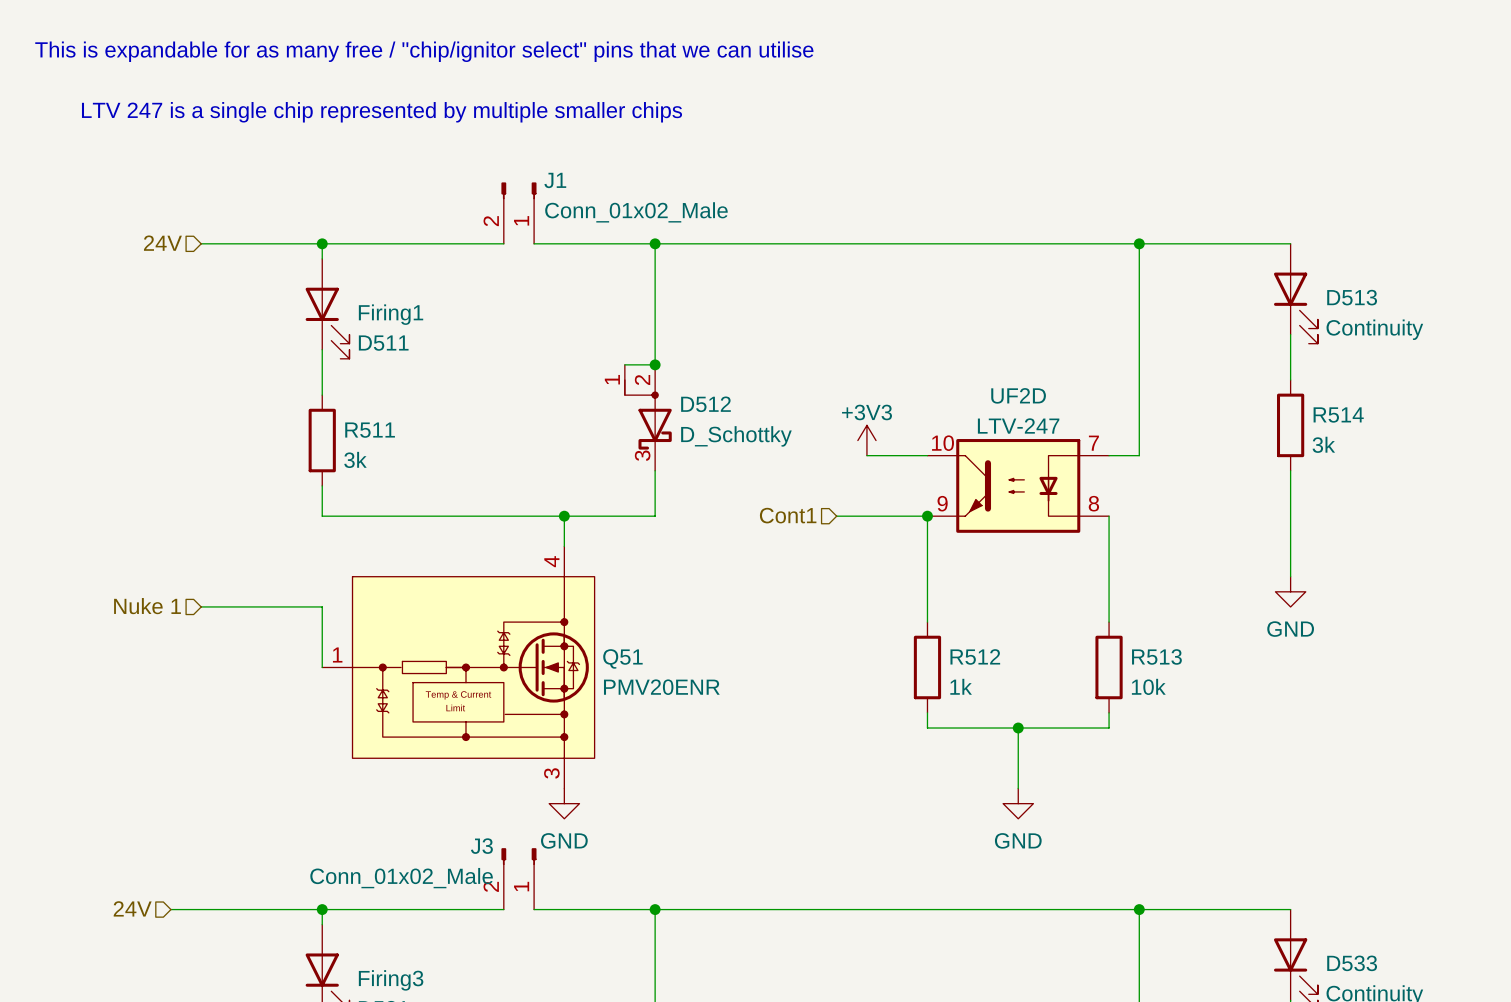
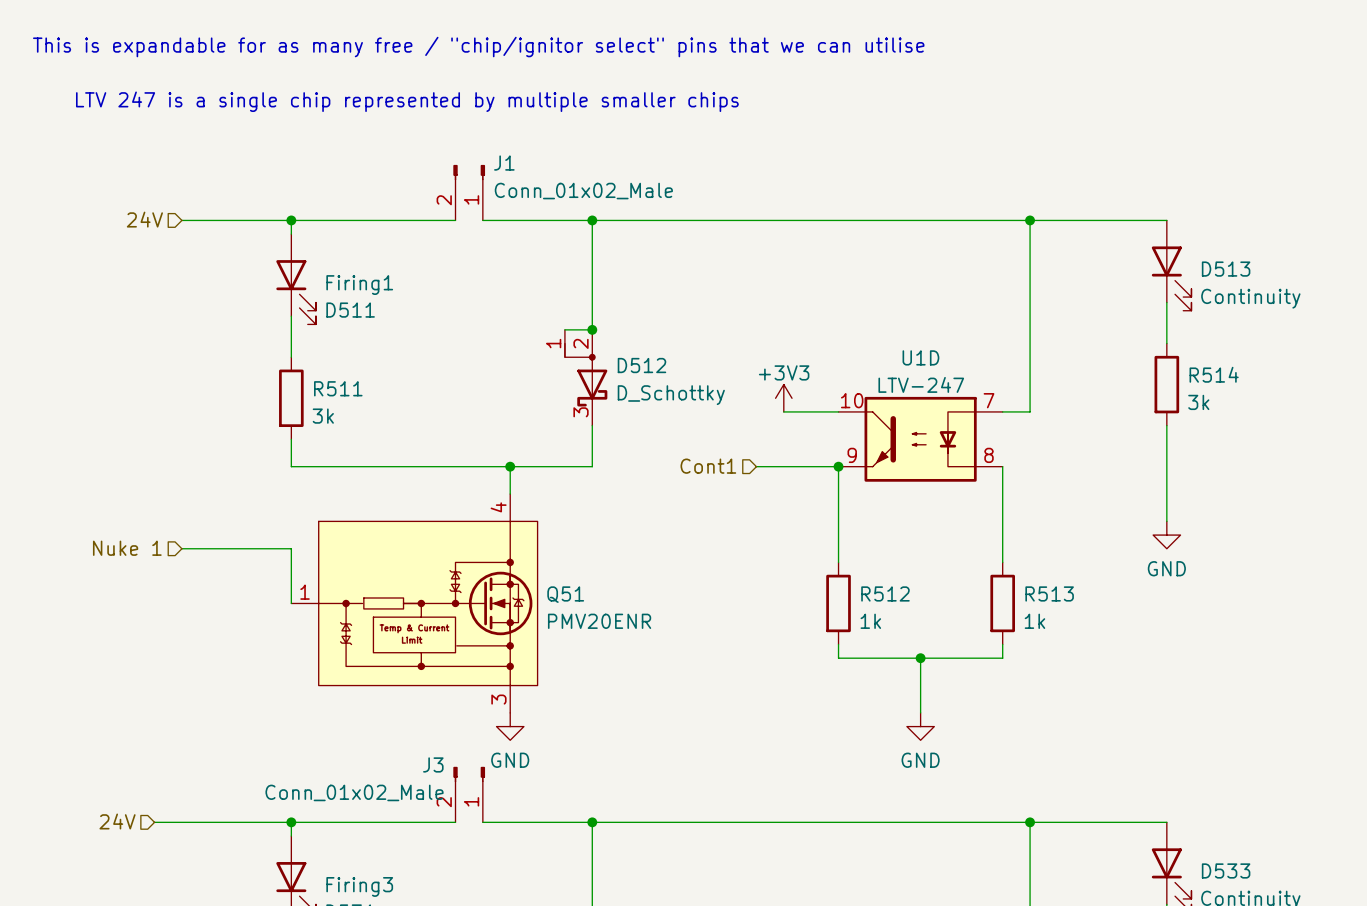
UF2D name: UF2D (1018, 395) -> U1D (920, 357)
R513 value: 10k (1148, 686) -> 1k (1034, 621)

